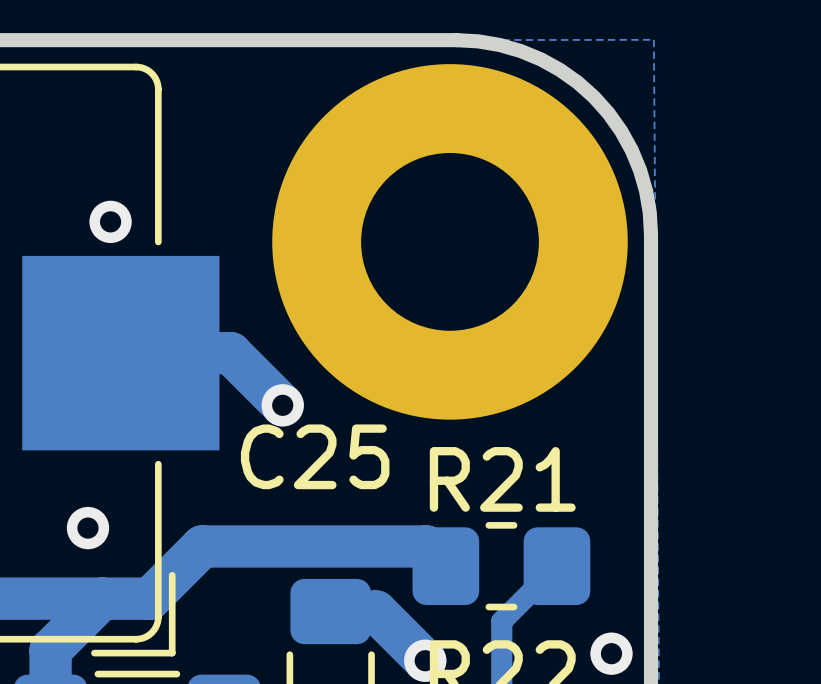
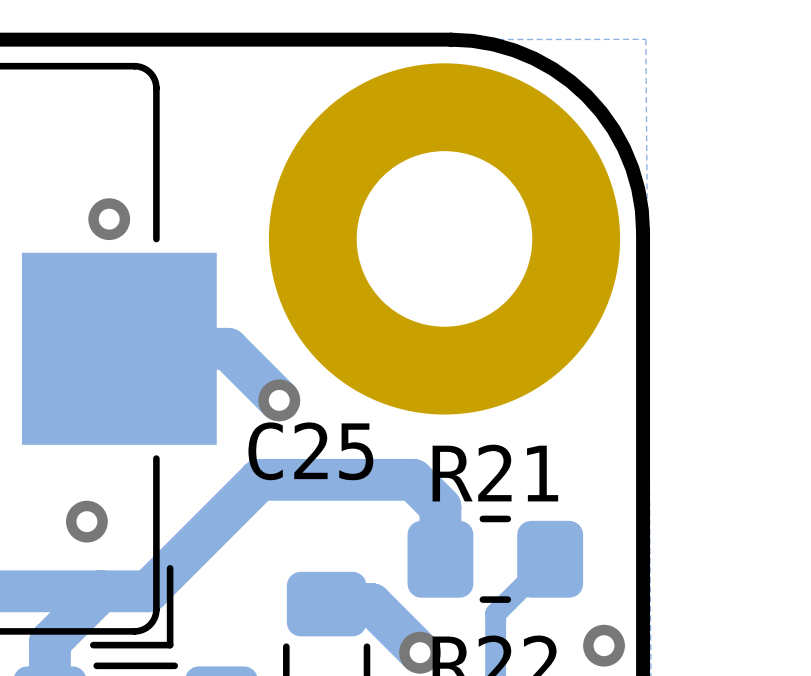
track: (202, 546) (426, 546) (445, 566) -> (199, 539) (259, 479) (413, 479) (440, 507) (440, 559)

